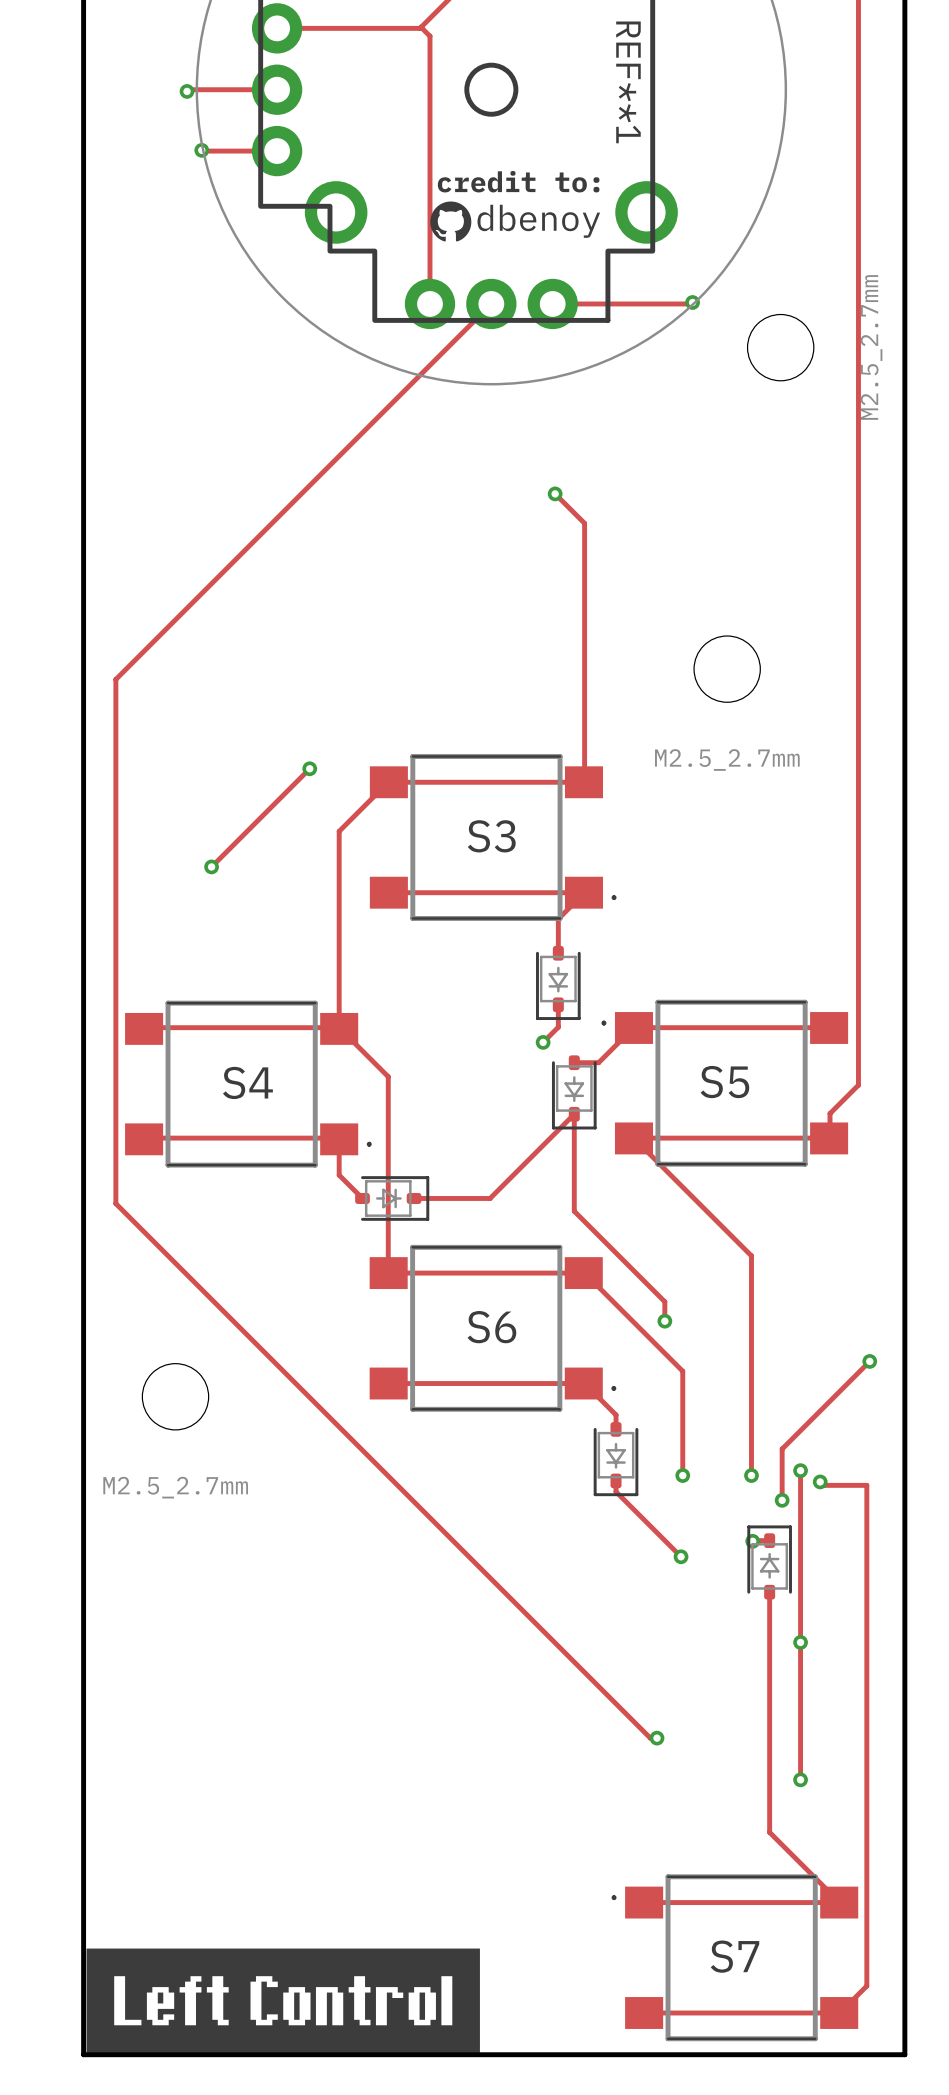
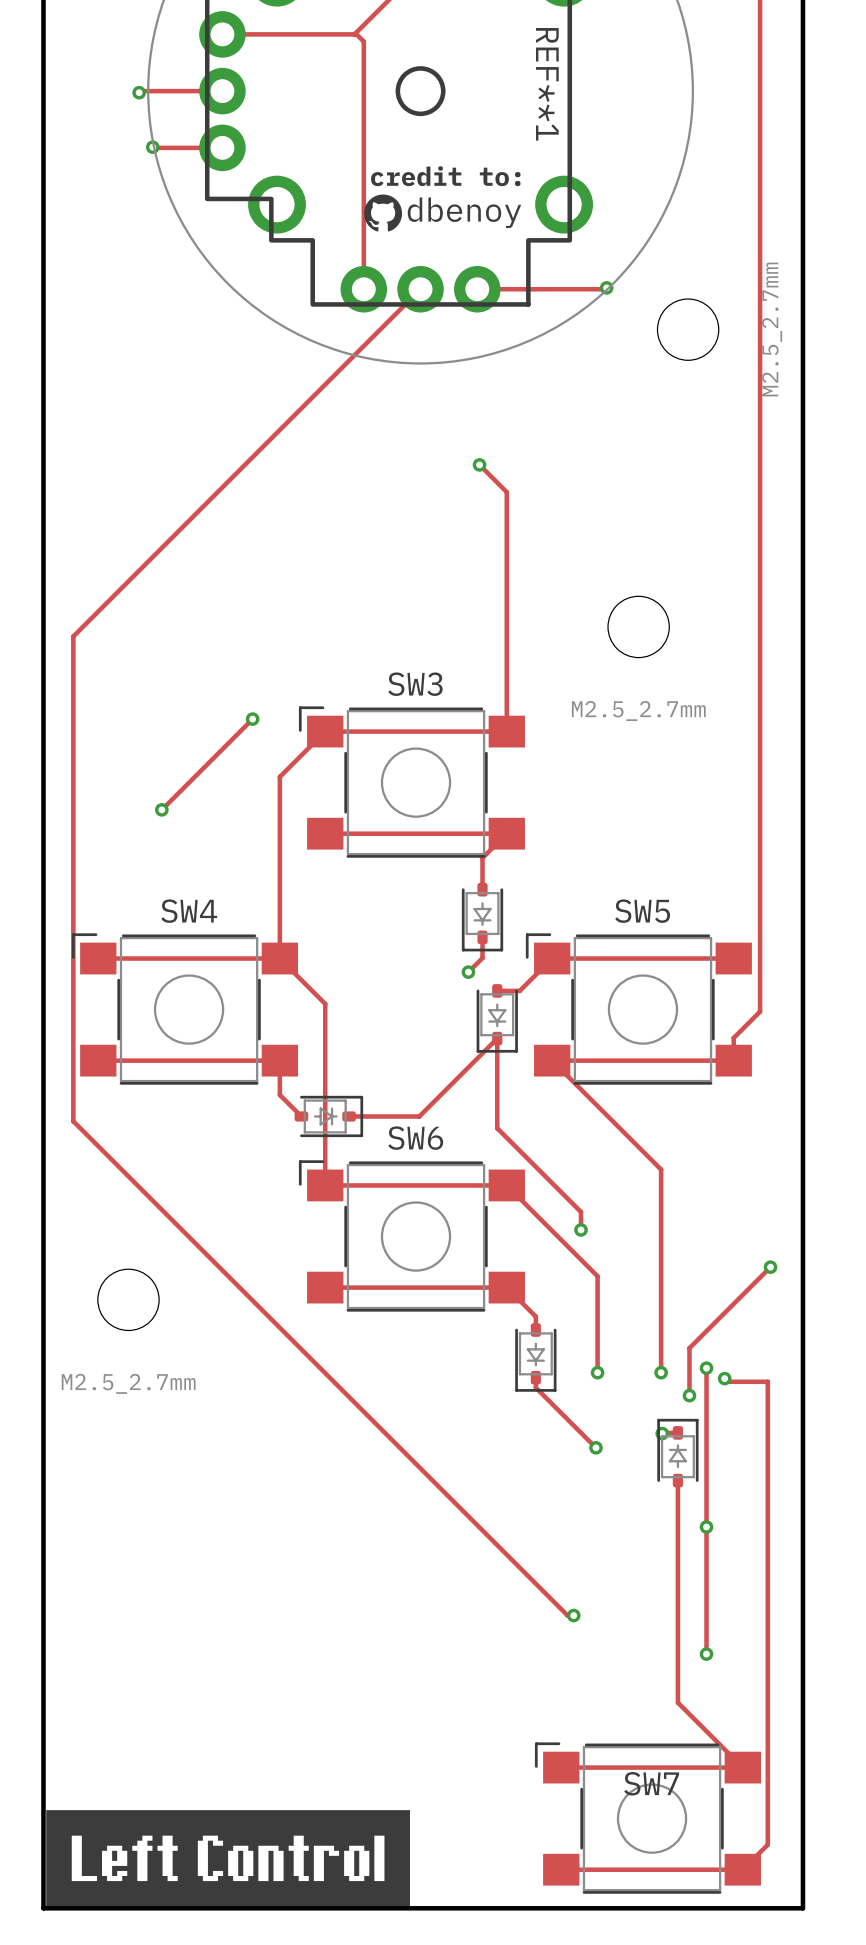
SW3: none -> (411, 782)
S3: (493, 837) -> none
SW4: none -> (184, 1009)
SW5: none -> (638, 1009)
S5: (724, 1083) -> none
S4: (248, 1084) -> none
SW6: none -> (411, 1235)
S6: (492, 1328) -> none
S7: (734, 1957) -> none
SW7: none -> (647, 1818)

